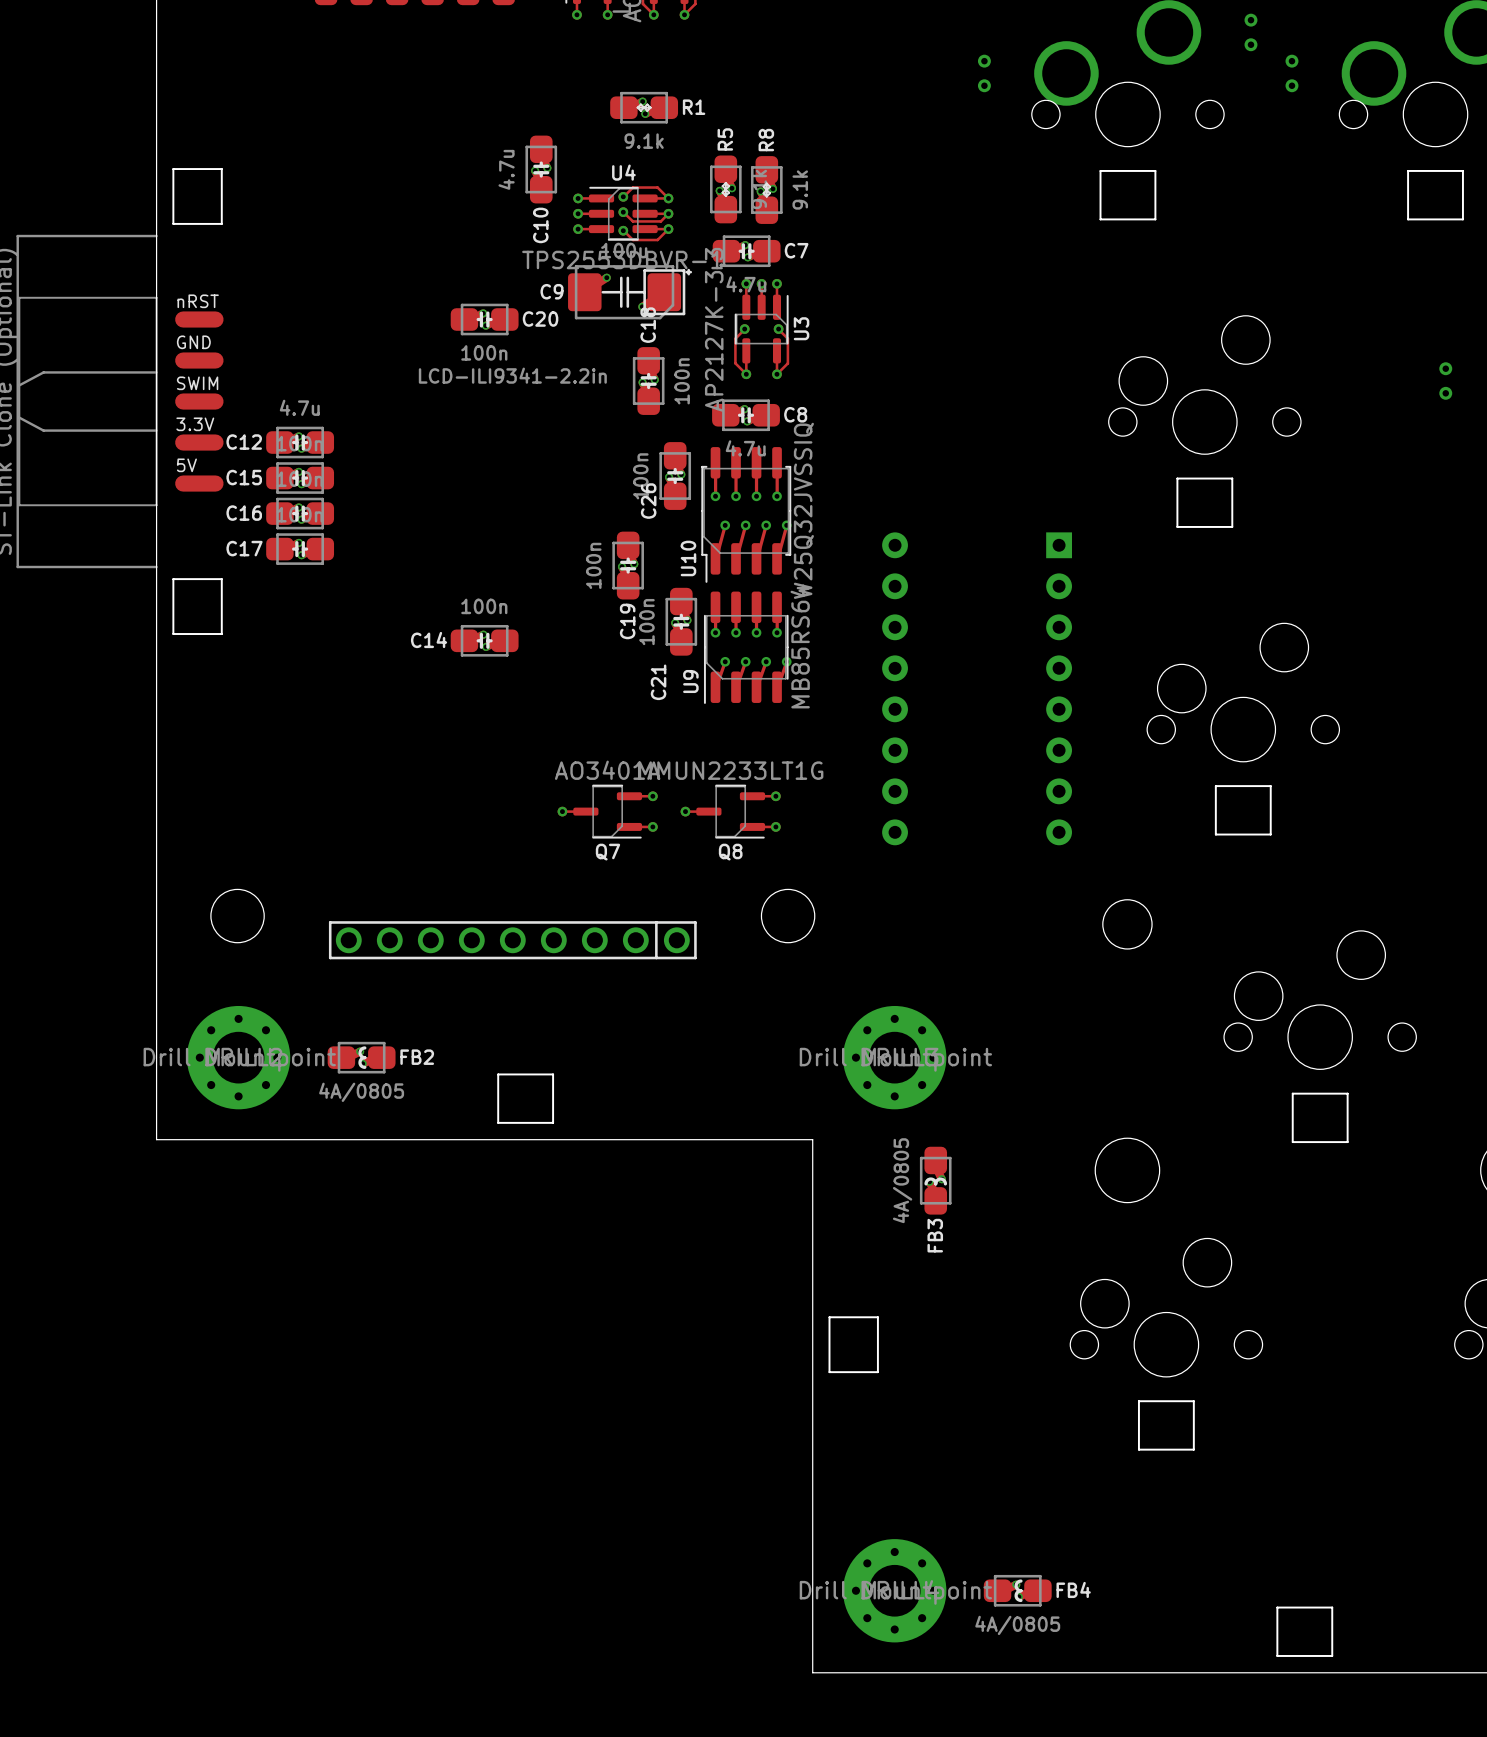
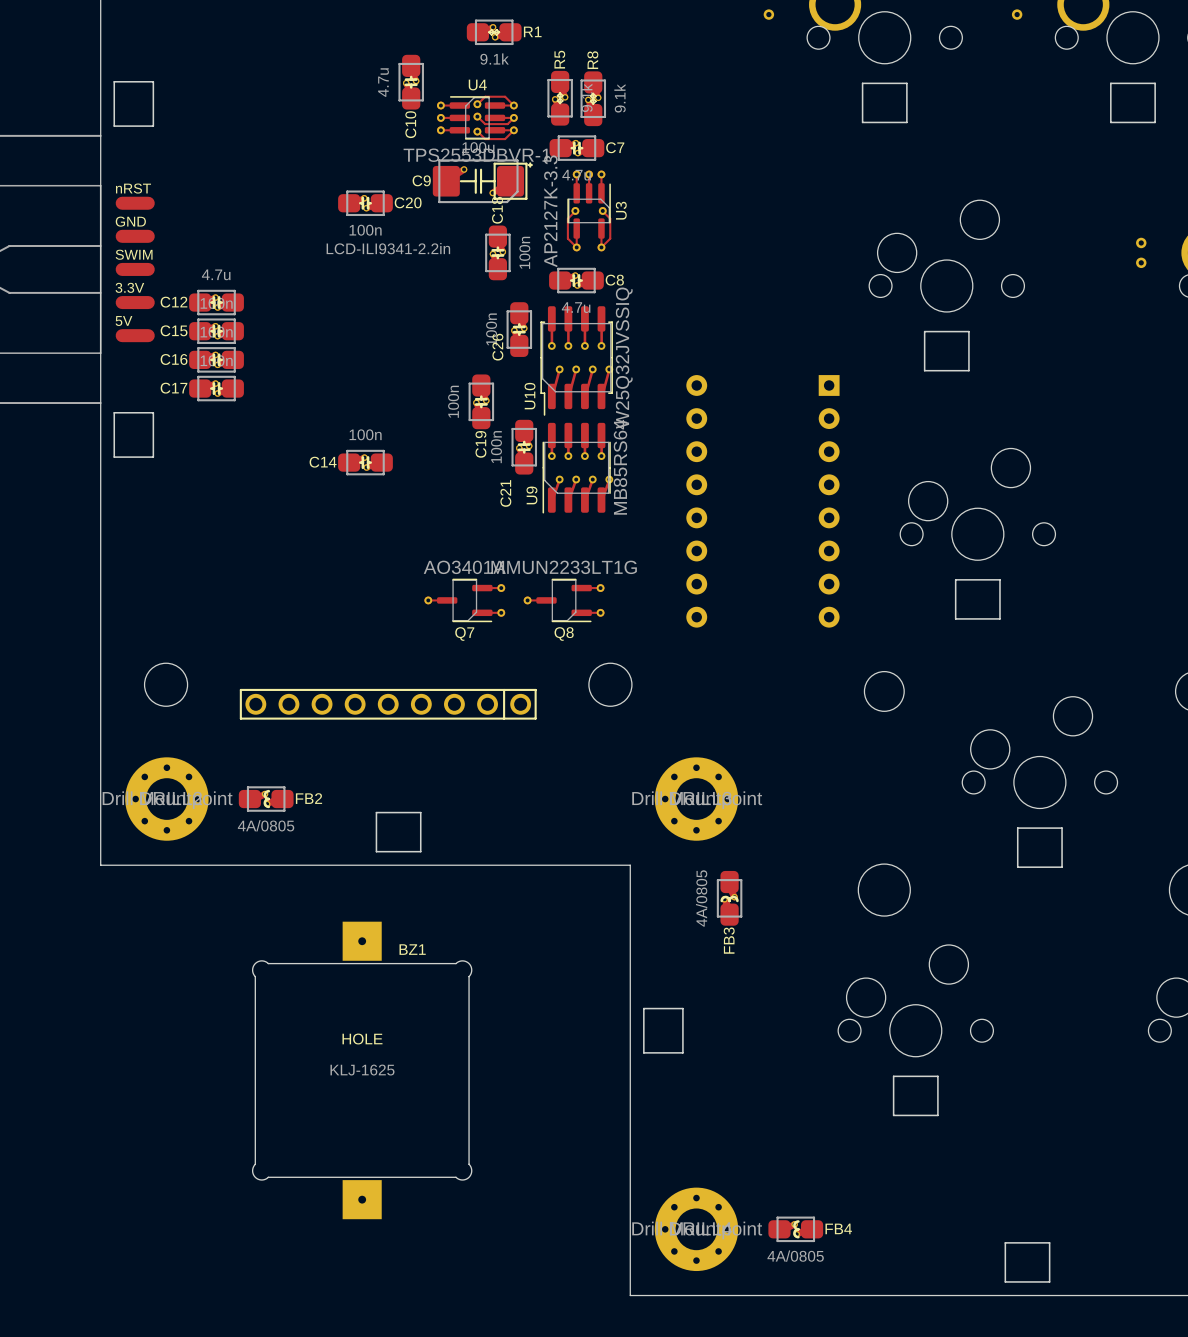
BZ1: none -> KLJ-1625 (362, 1070)

